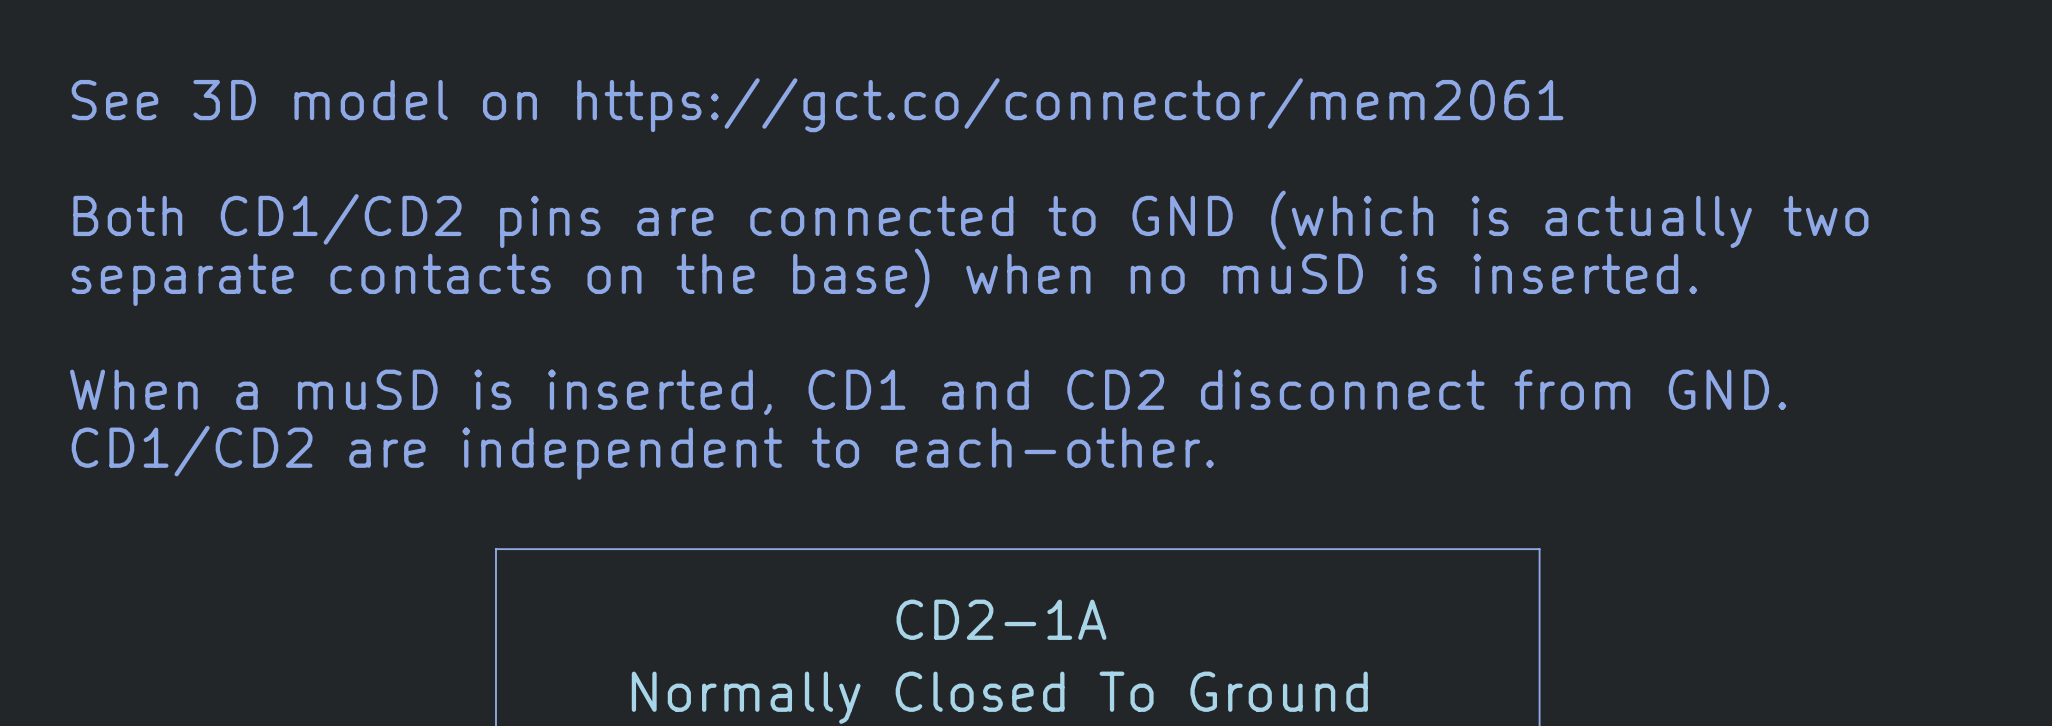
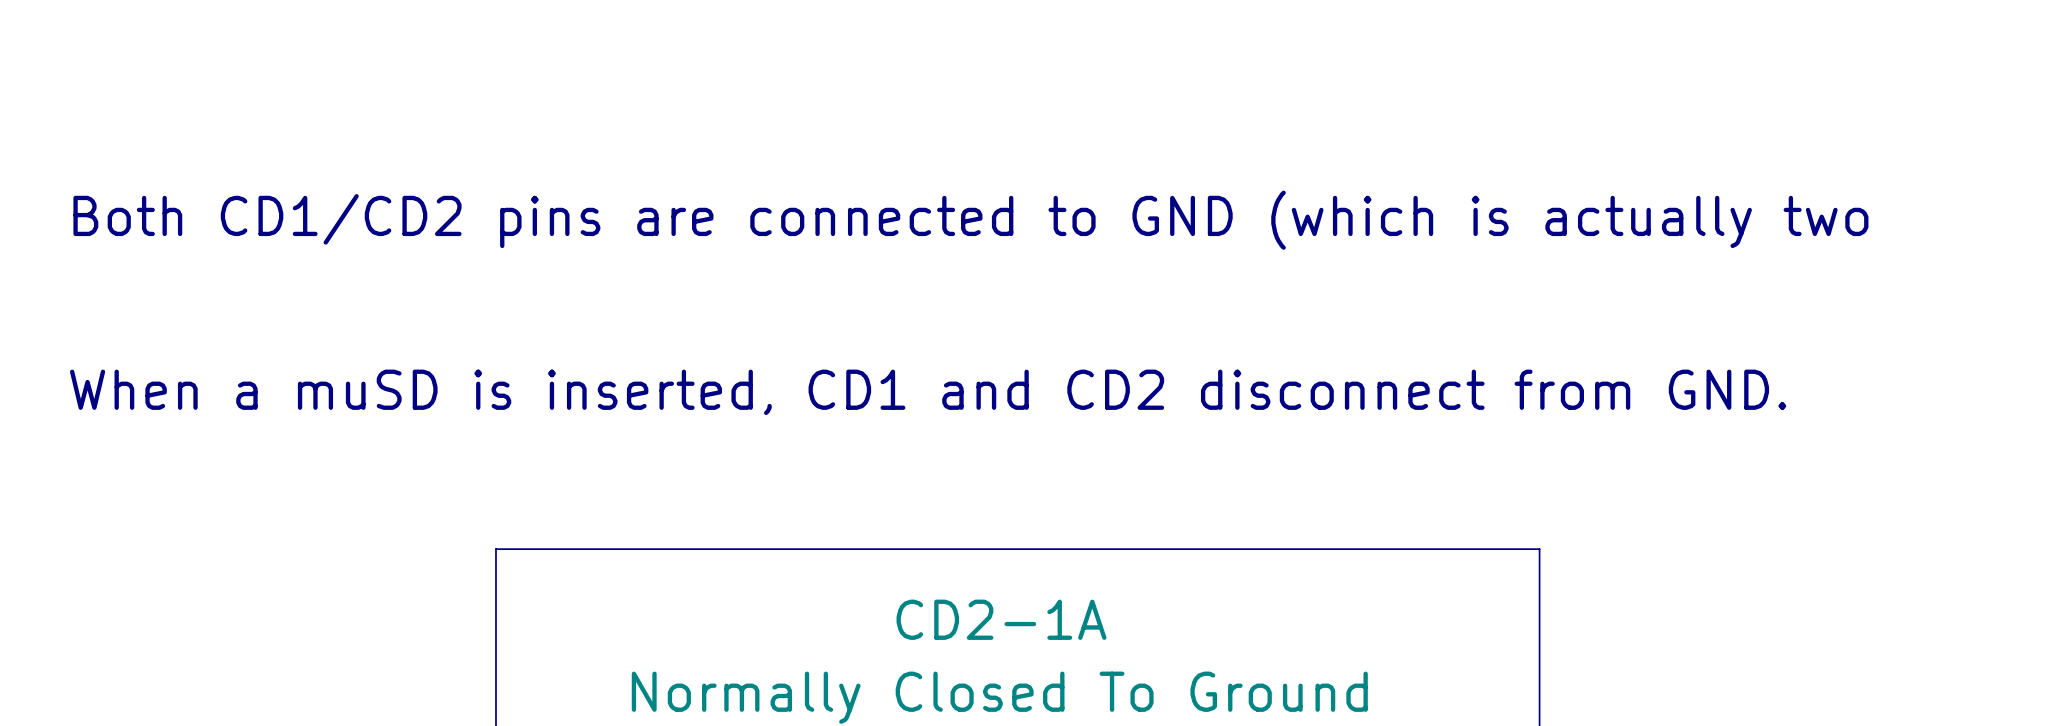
text: See 3D model on https://gct.co/connector/mem2061 (817, 105) -> none
text: separate contacts on the base) when no muSD is inserted. (884, 278) -> none
text: CD1/CD2 are independent to each-other. (642, 452) -> none

